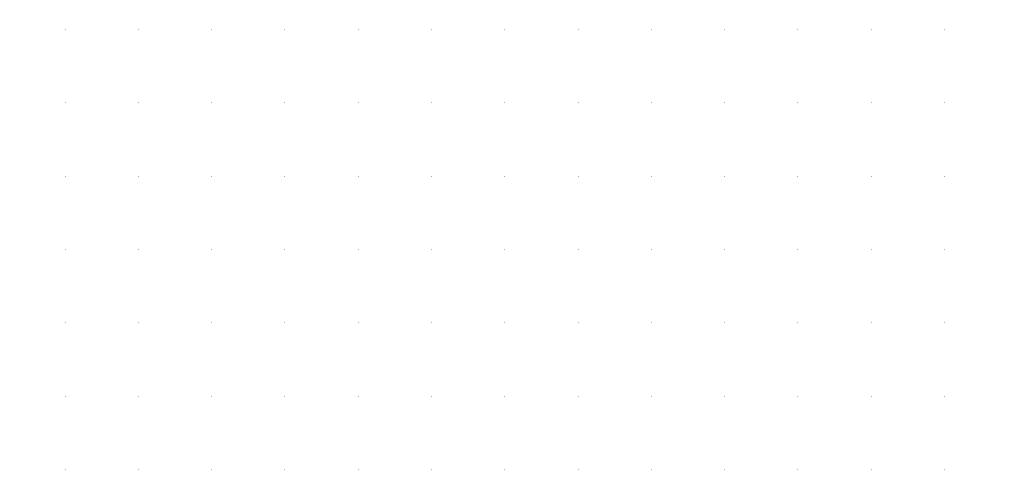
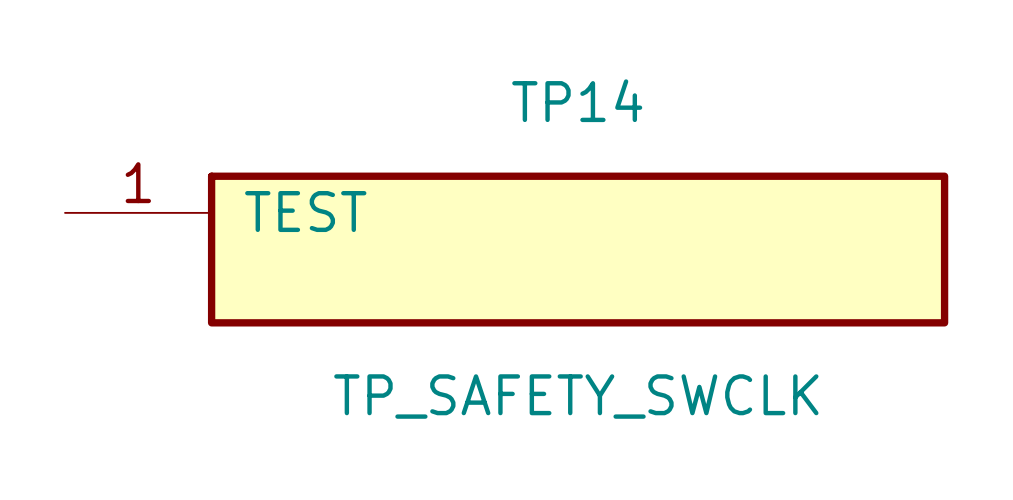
TP14: none -> TP_SAFETY_SWCLK (506, 249)

